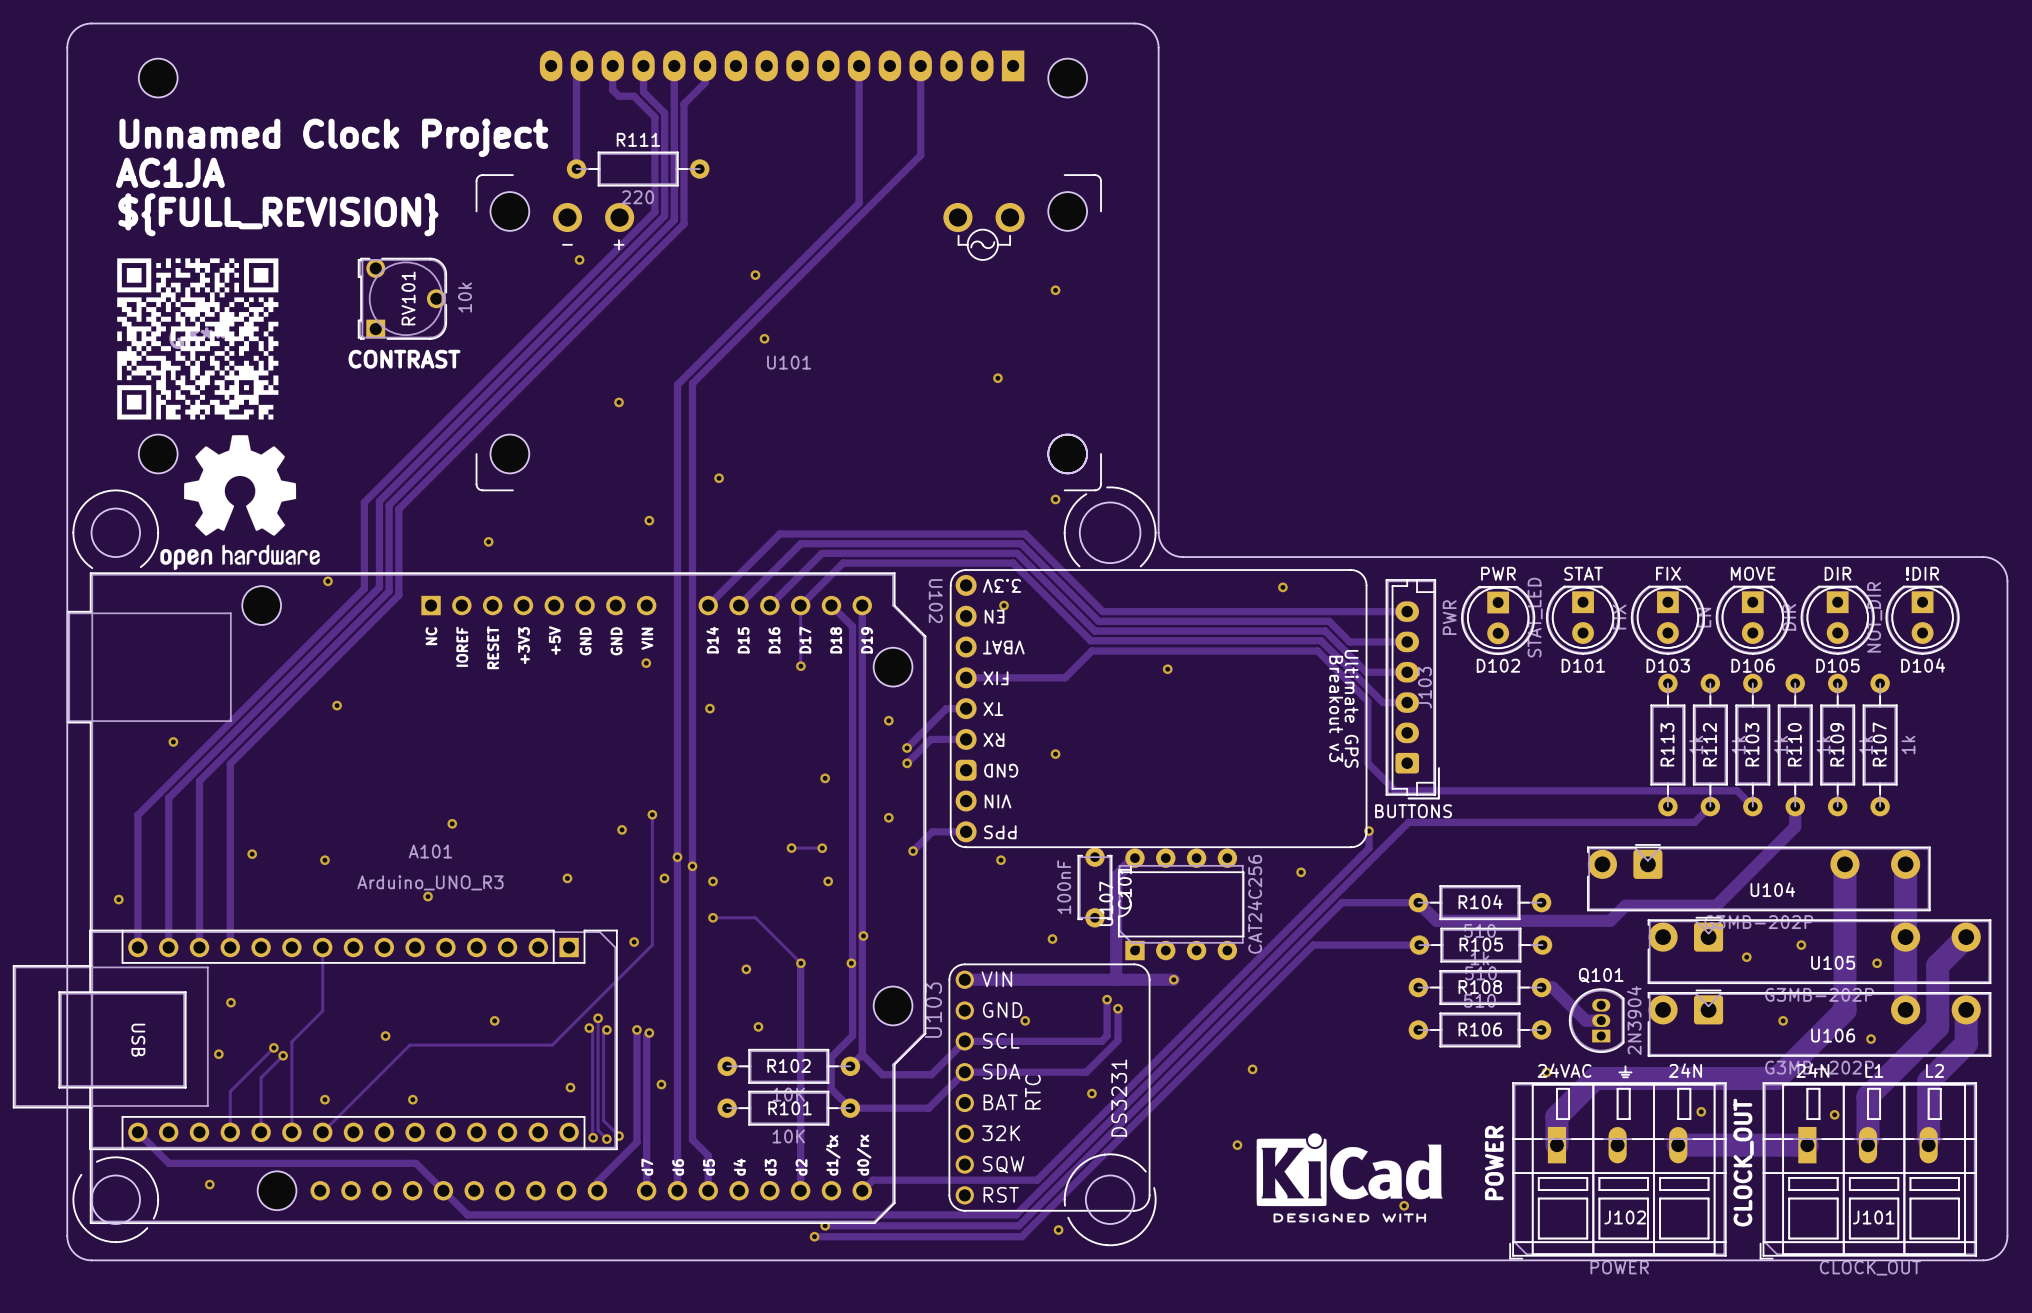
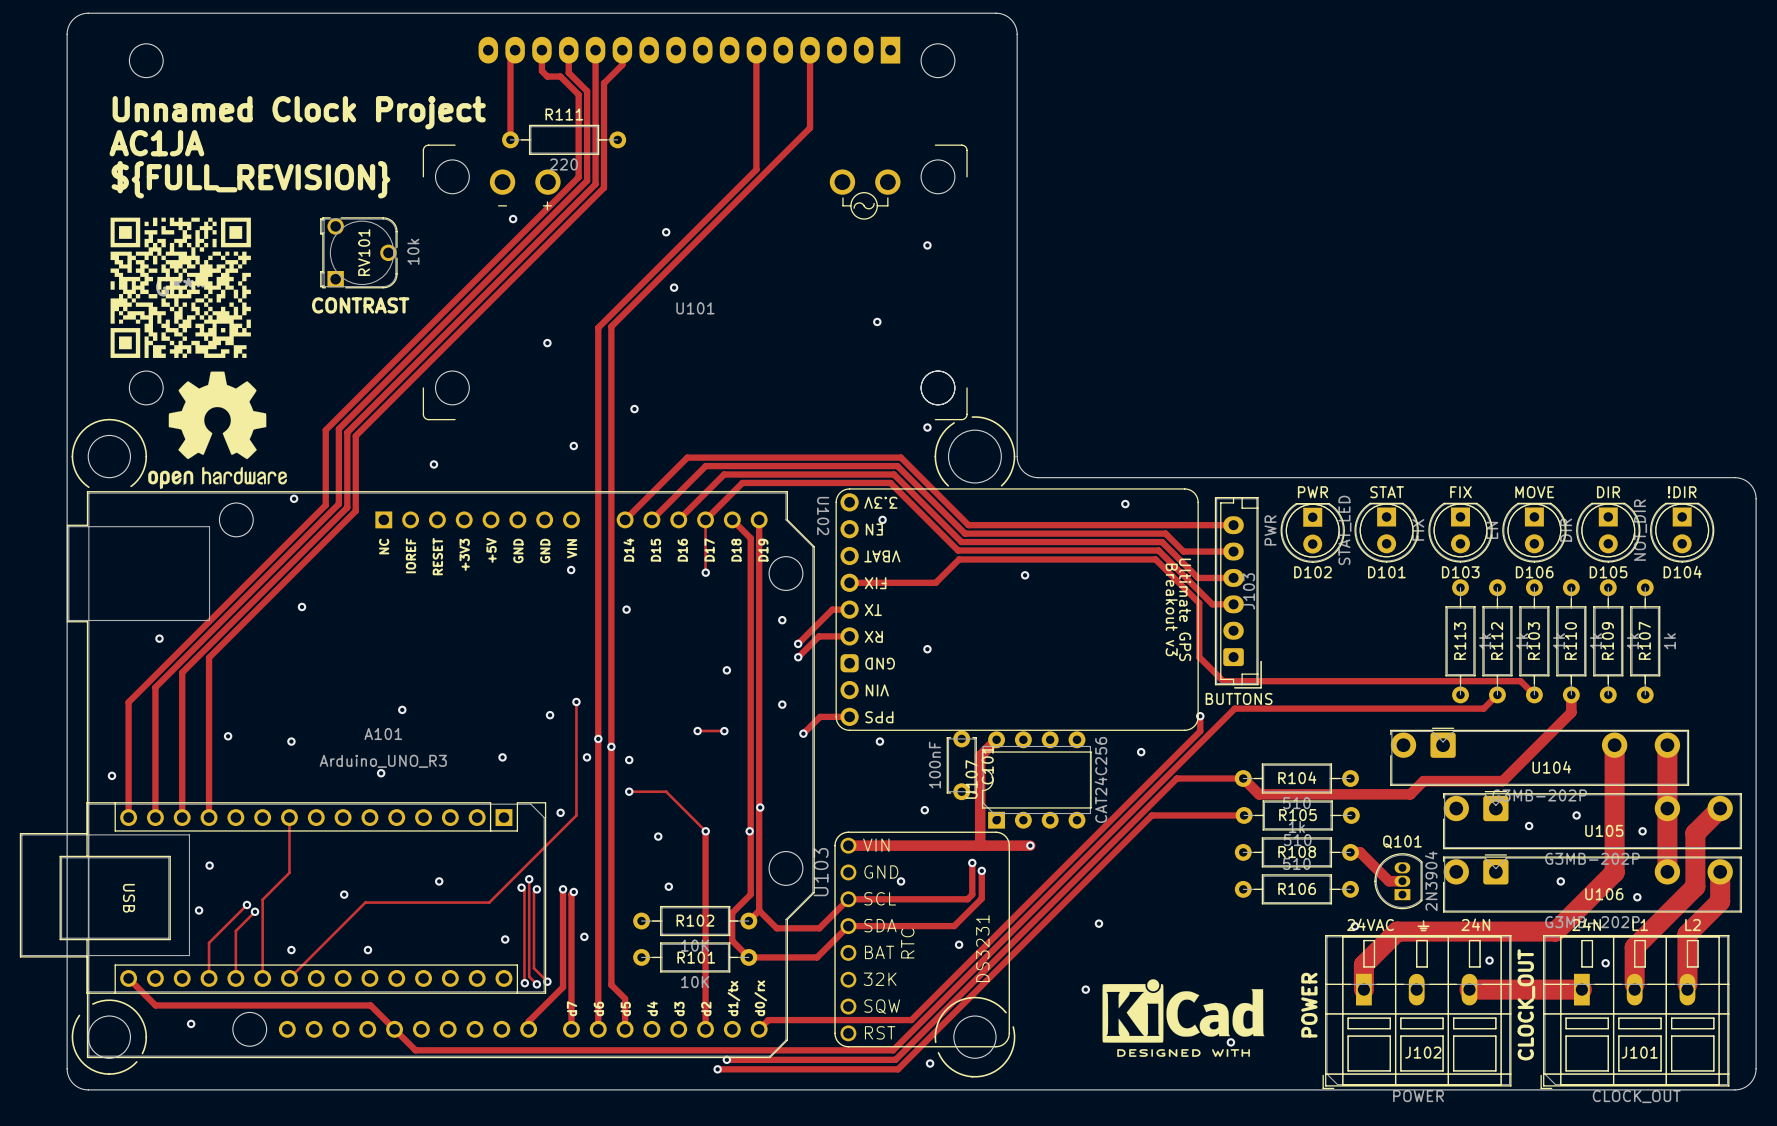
via: (828, 881) -> none

